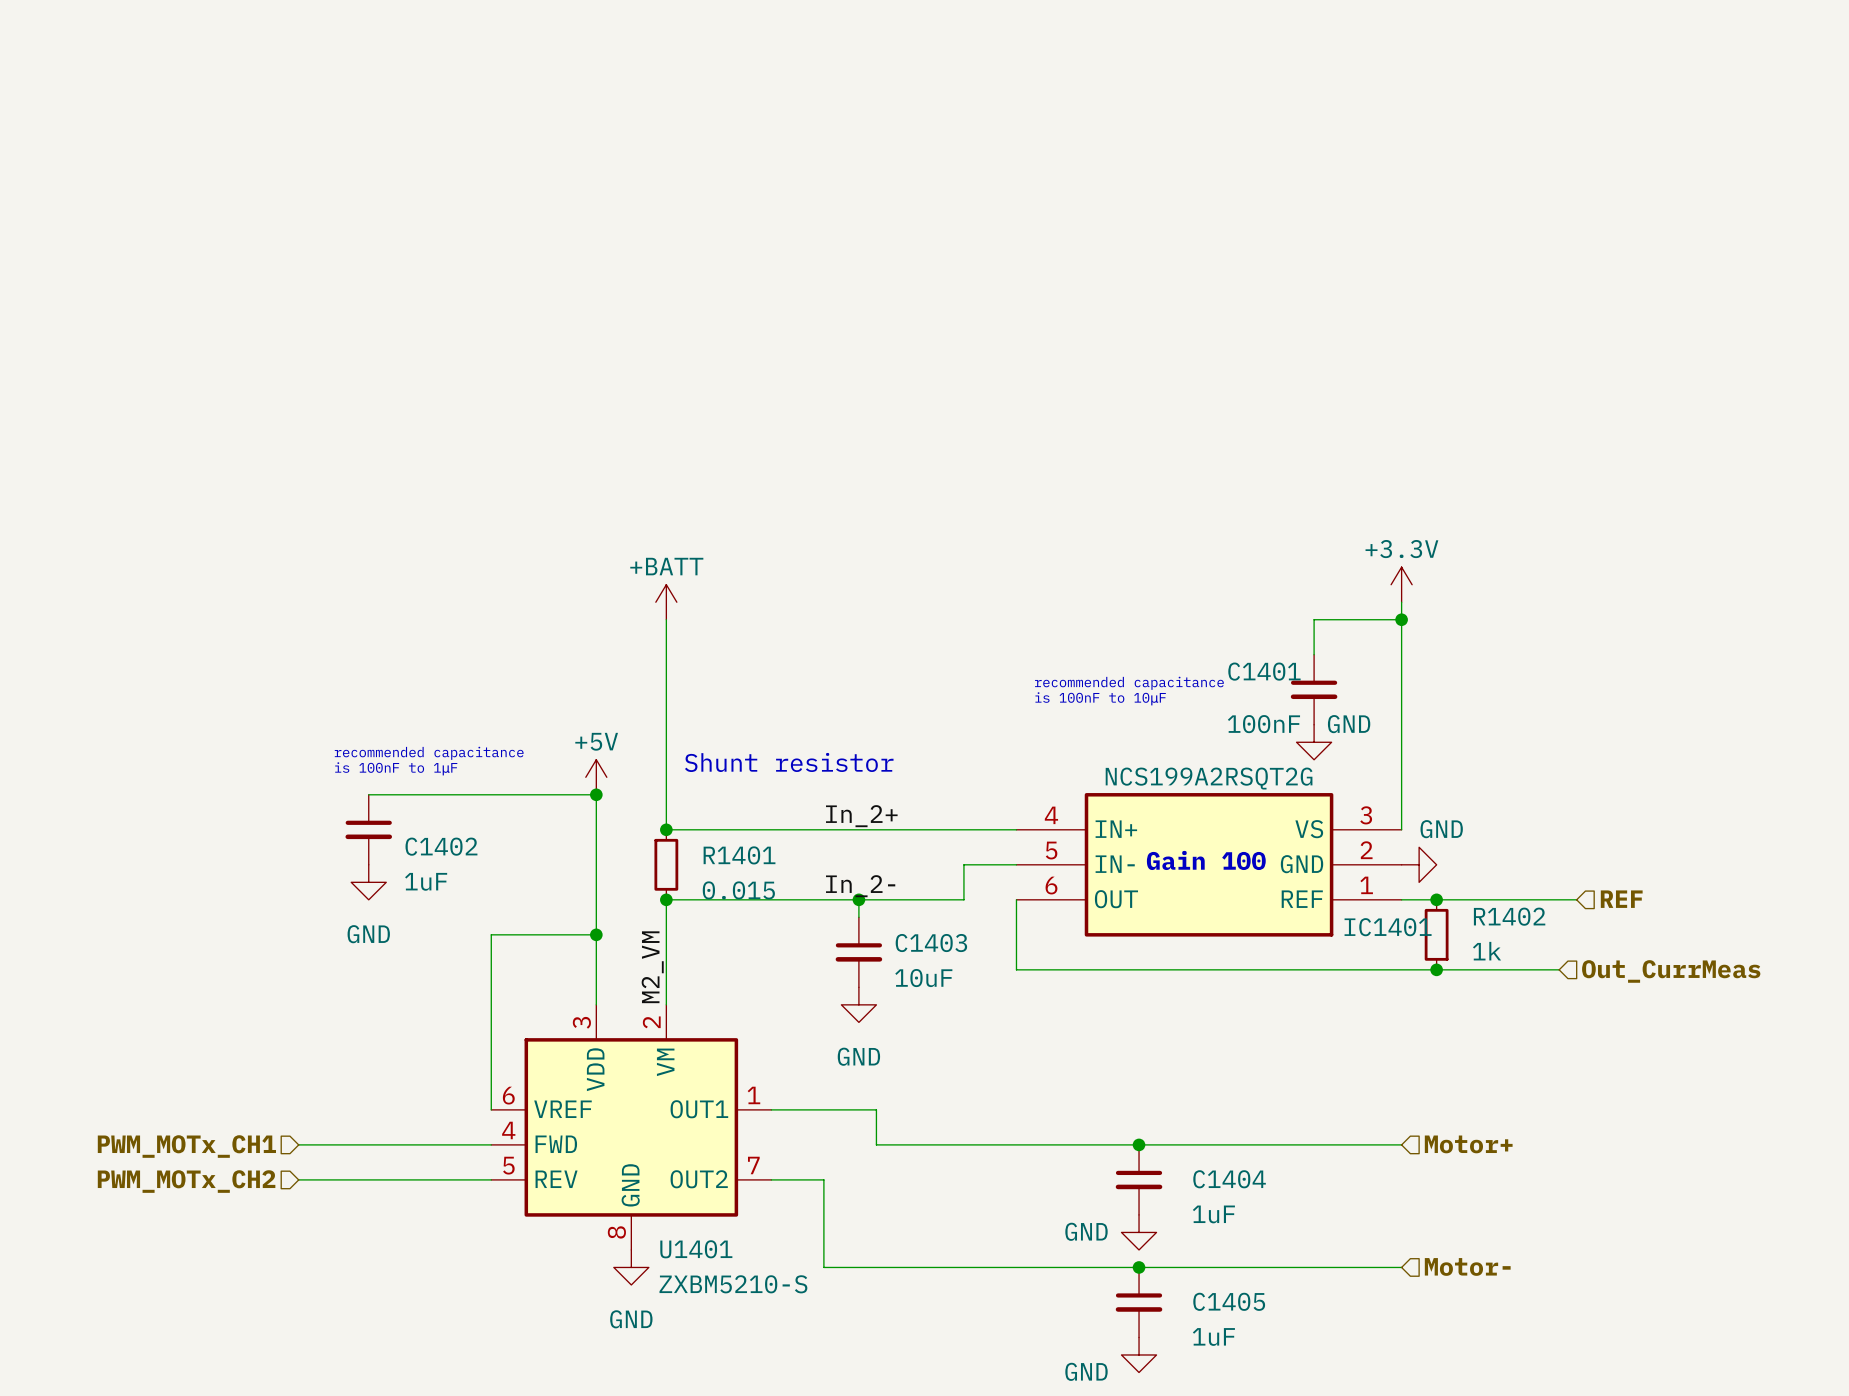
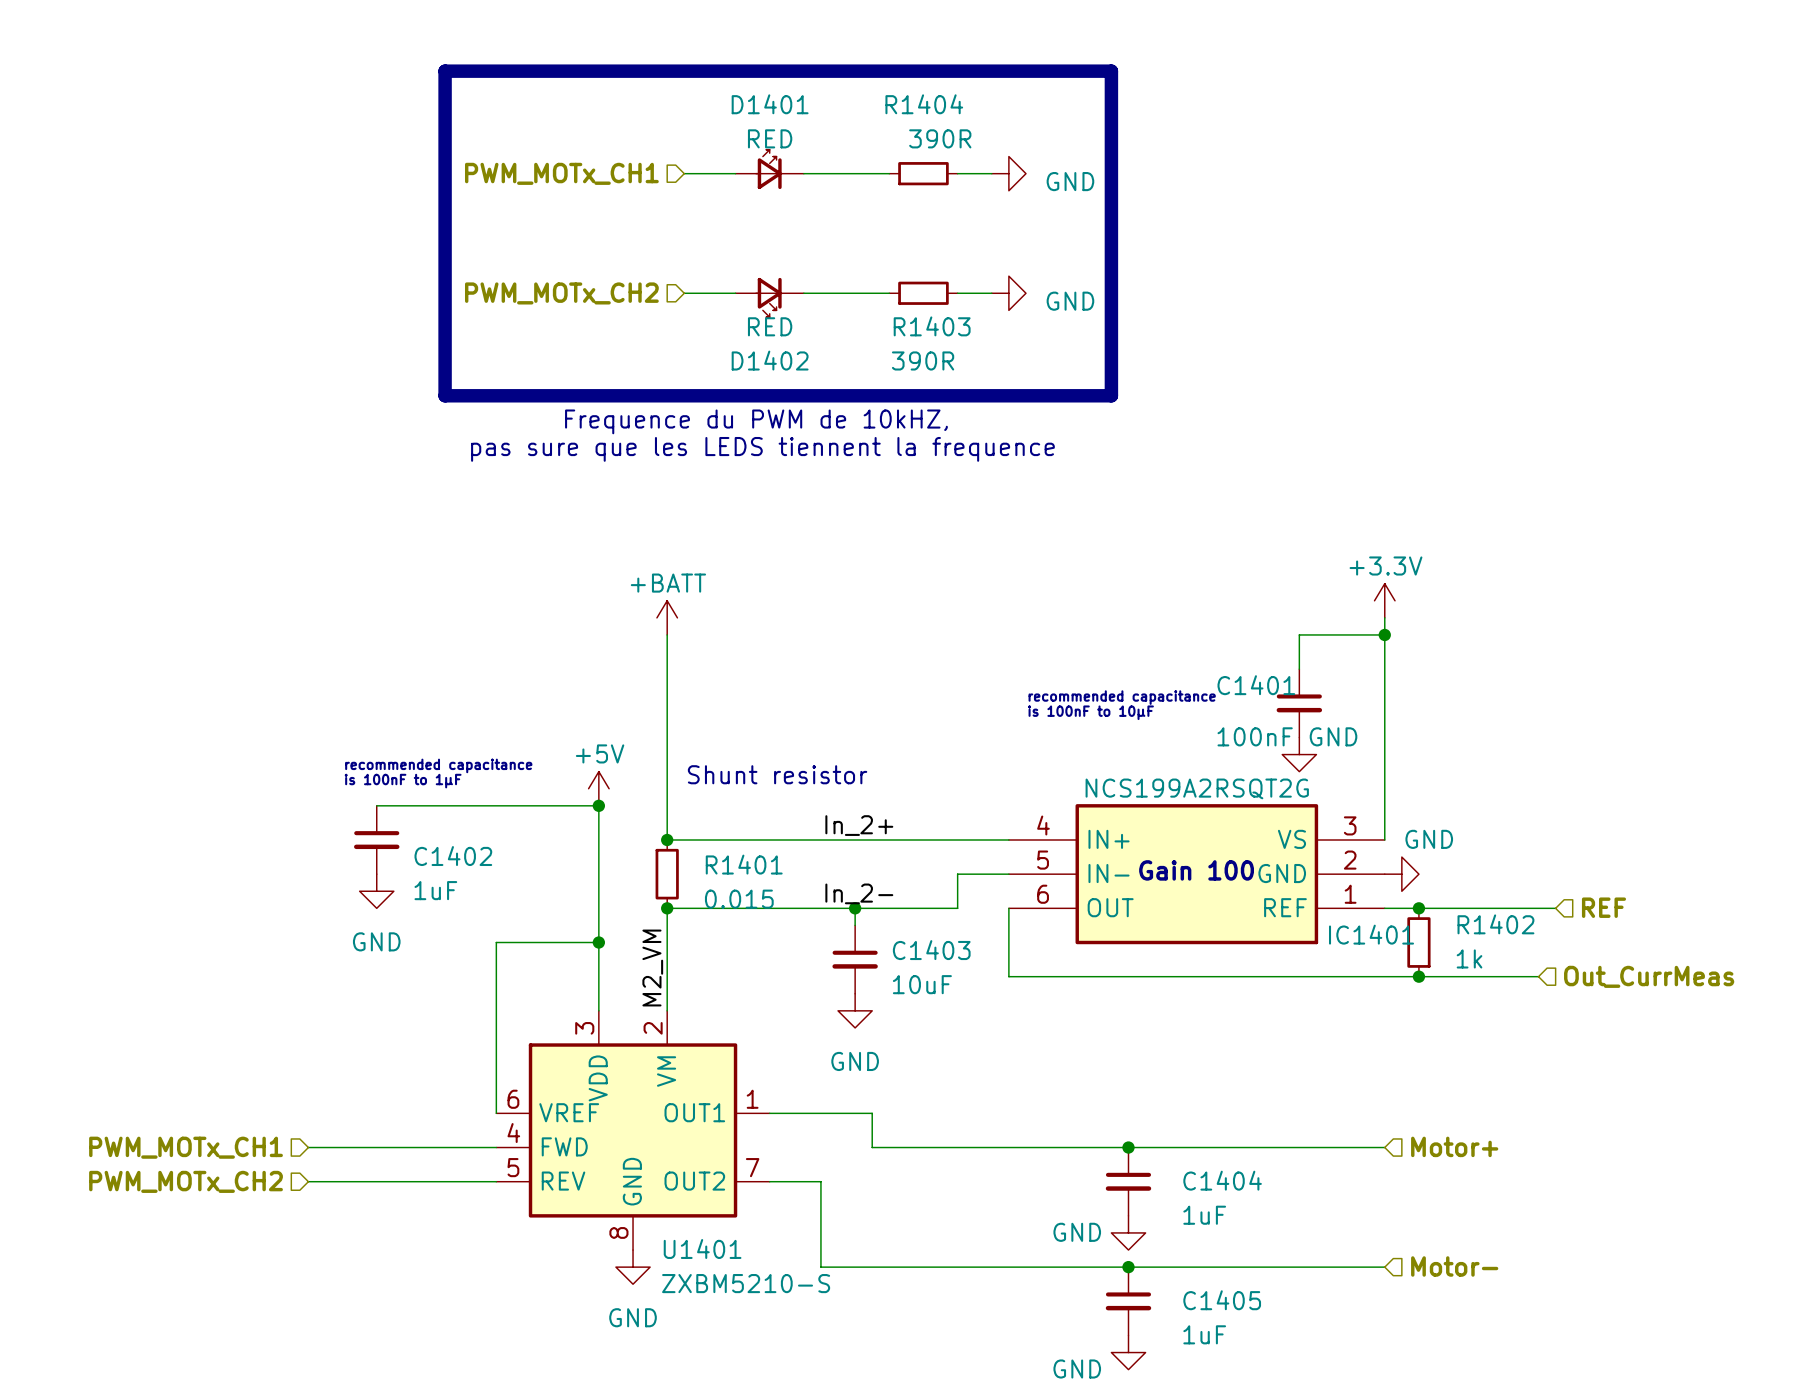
line: none -> (445, 71) (1111, 71) (1111, 395) (445, 395) (445, 71)
D1401: none -> RED (769, 169)
wire: none -> (684, 173) (735, 173)
wire: none -> (803, 173) (889, 173)
R1403: none -> 390R (923, 173)
wire: none -> (957, 173) (991, 173)
power symbol: none -> GND (1008, 173)
hierarchical label: none -> PWM_MOTx_CH1 (561, 173)
wire: none -> (684, 293) (735, 293)
wire: none -> (803, 293) (889, 293)
R1404: none -> 390R (923, 293)
wire: none -> (957, 293) (991, 293)
power symbol: none -> GND (1008, 293)
hierarchical label: none -> PWM_MOTx_CH2 (561, 293)
D1402: none -> RED (769, 297)
text: none -> Frequence du PWM de 10kHZ, (756, 421)
text: none -> pas sure que les LEDS tiennent la frequence (762, 449)

